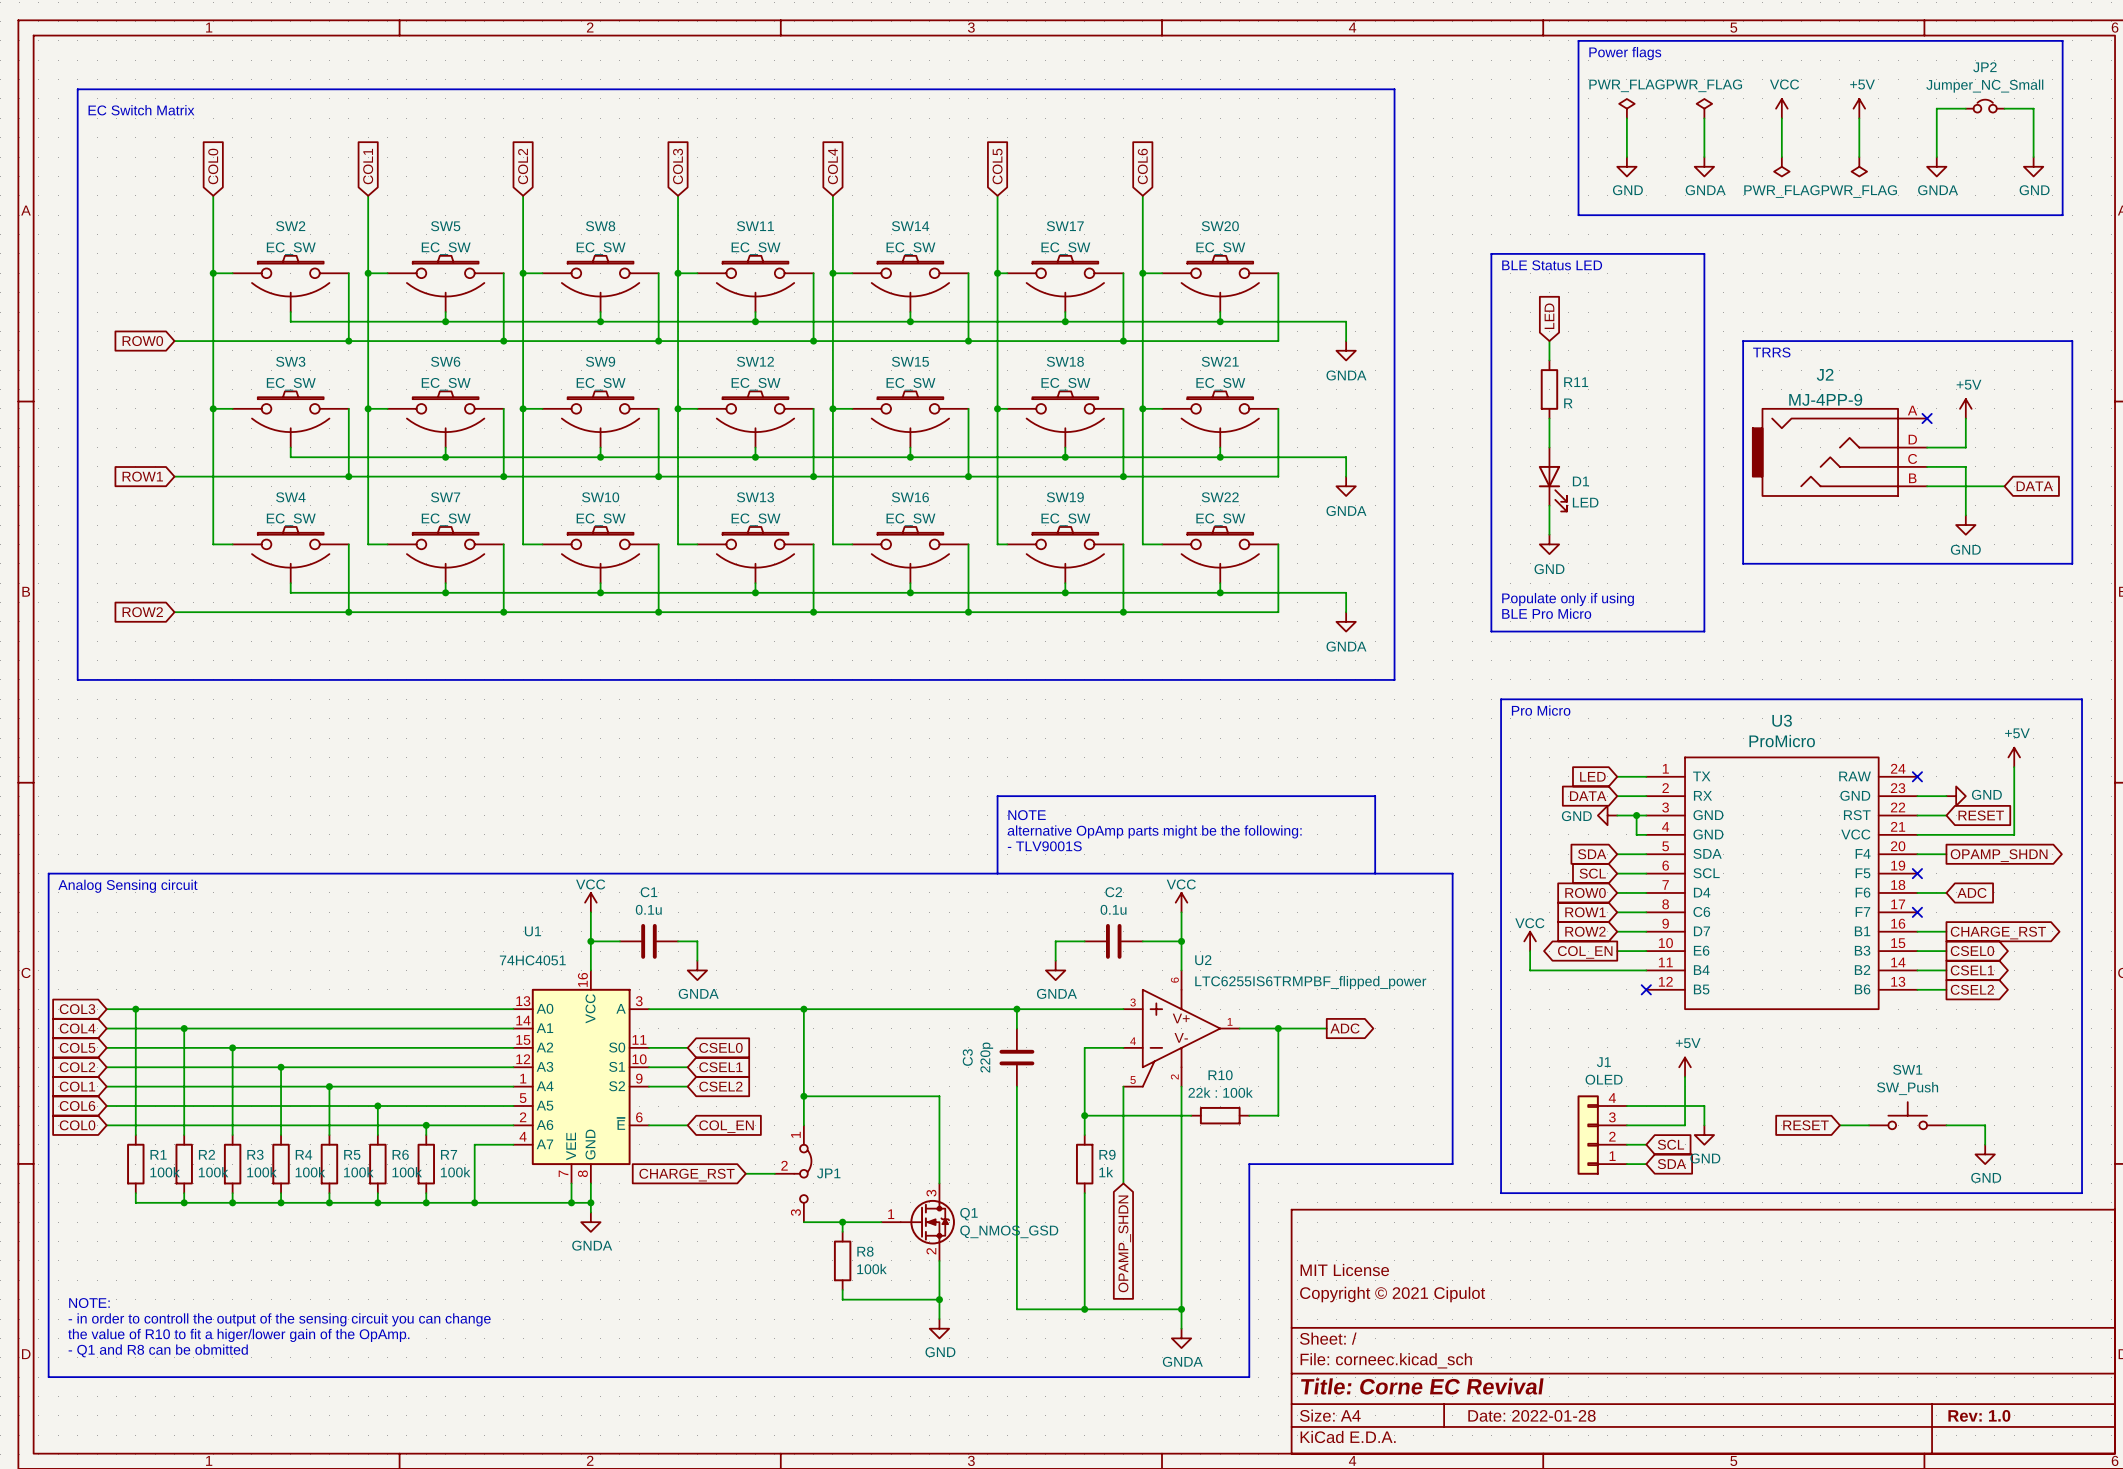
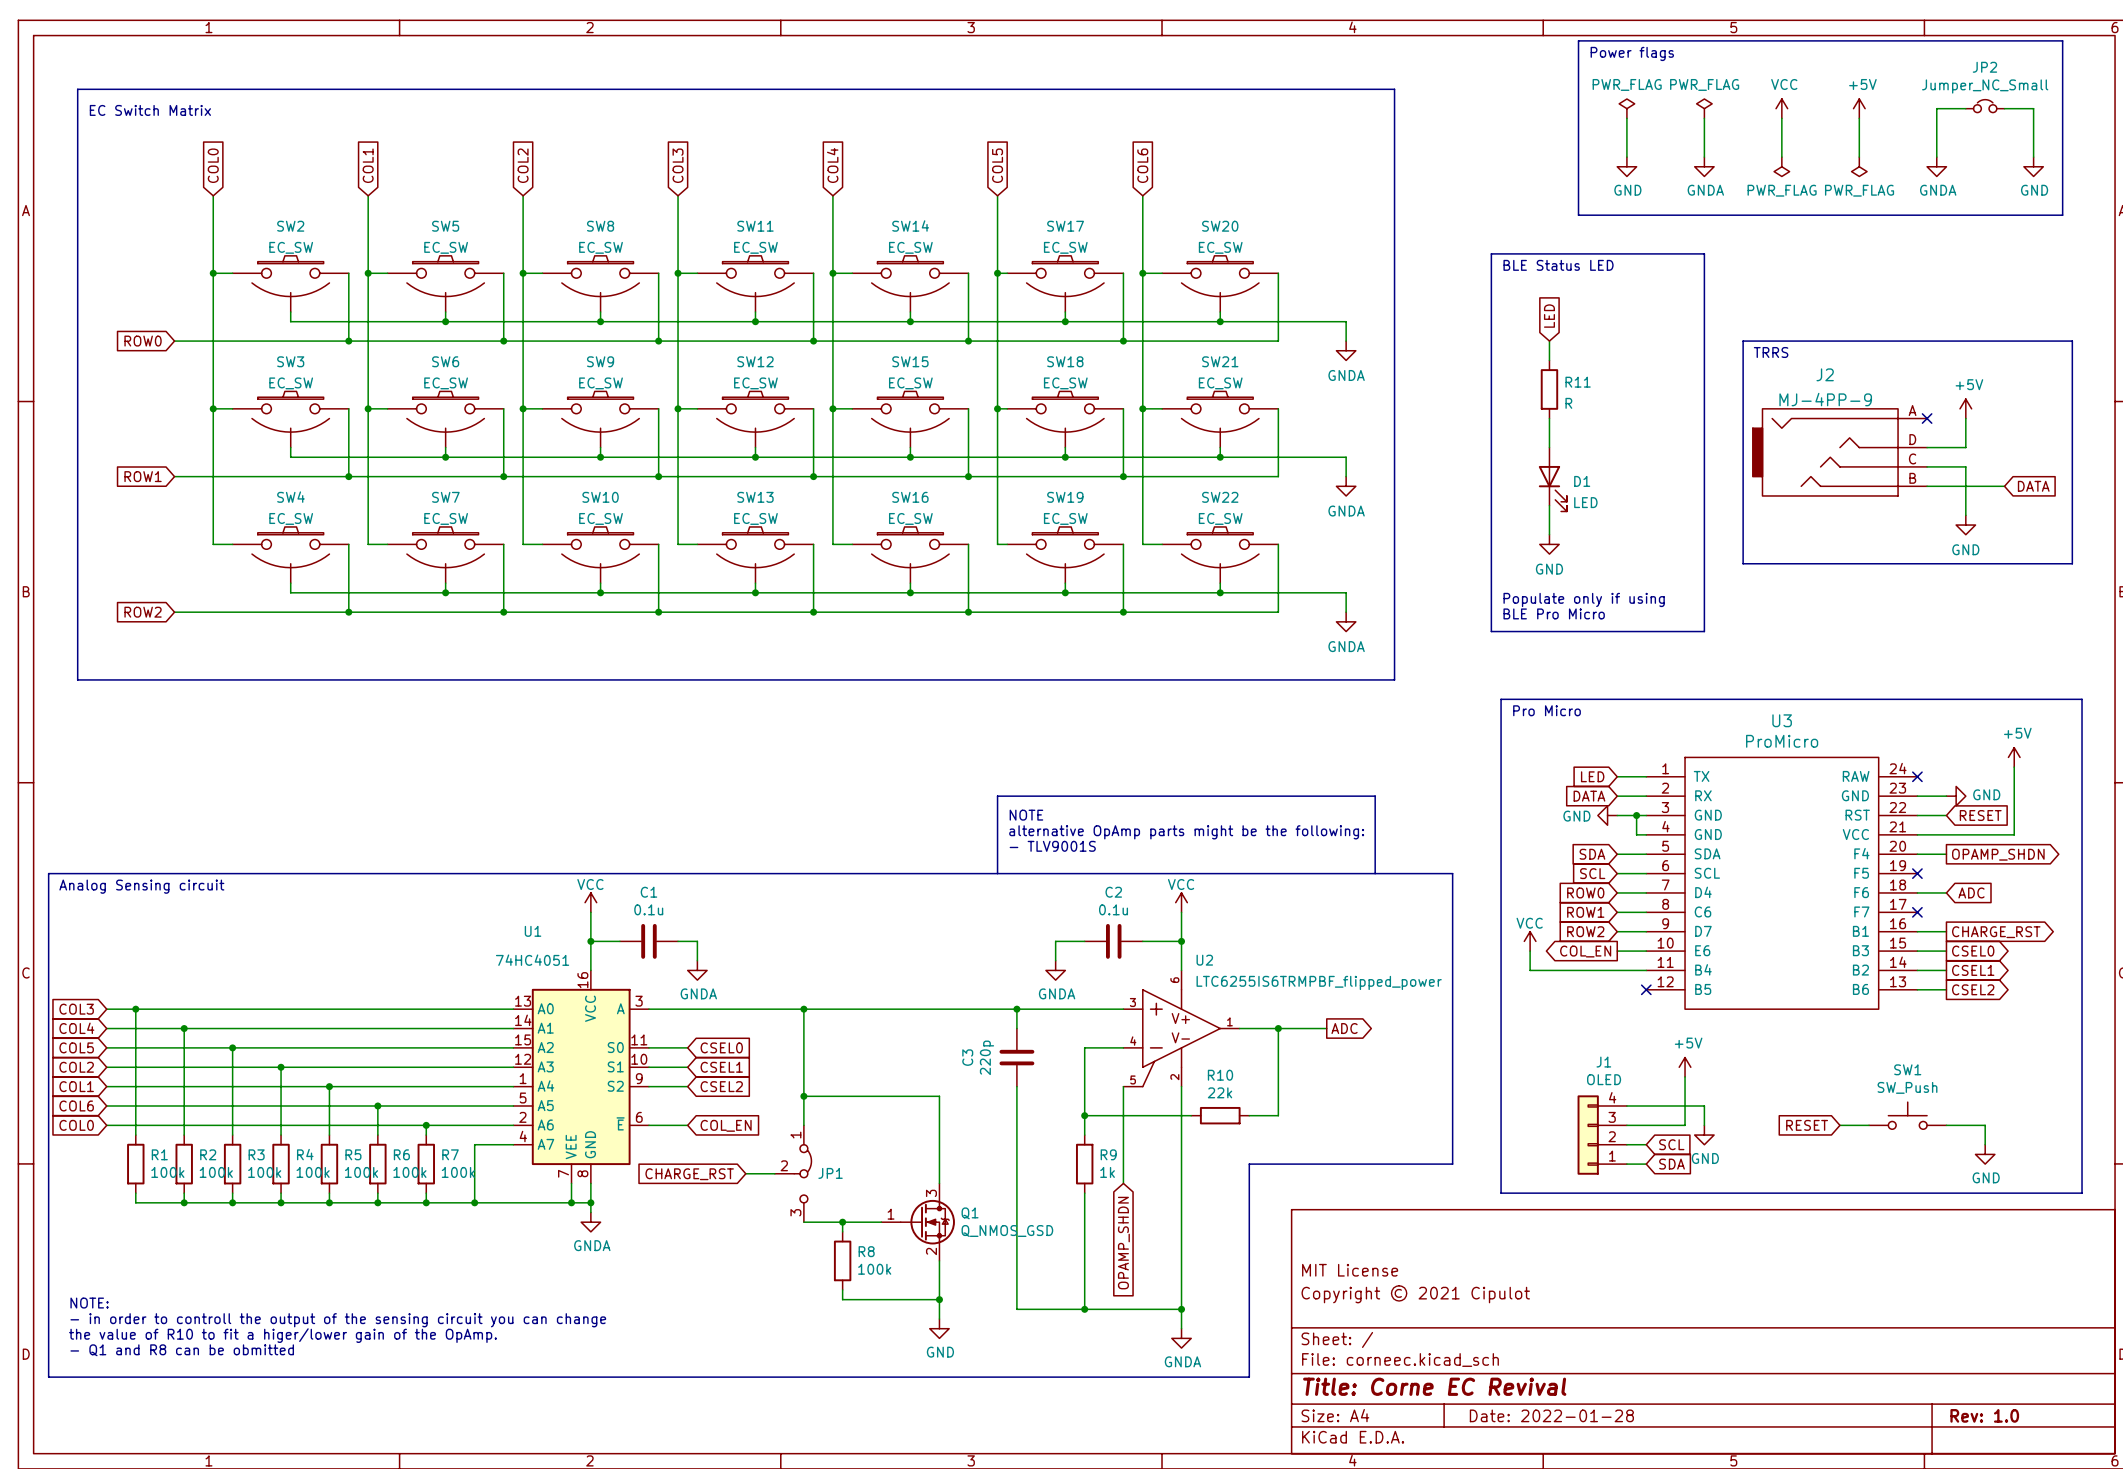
R10 value: 22k : 100k (1220, 1092) -> 22k (1220, 1092)

